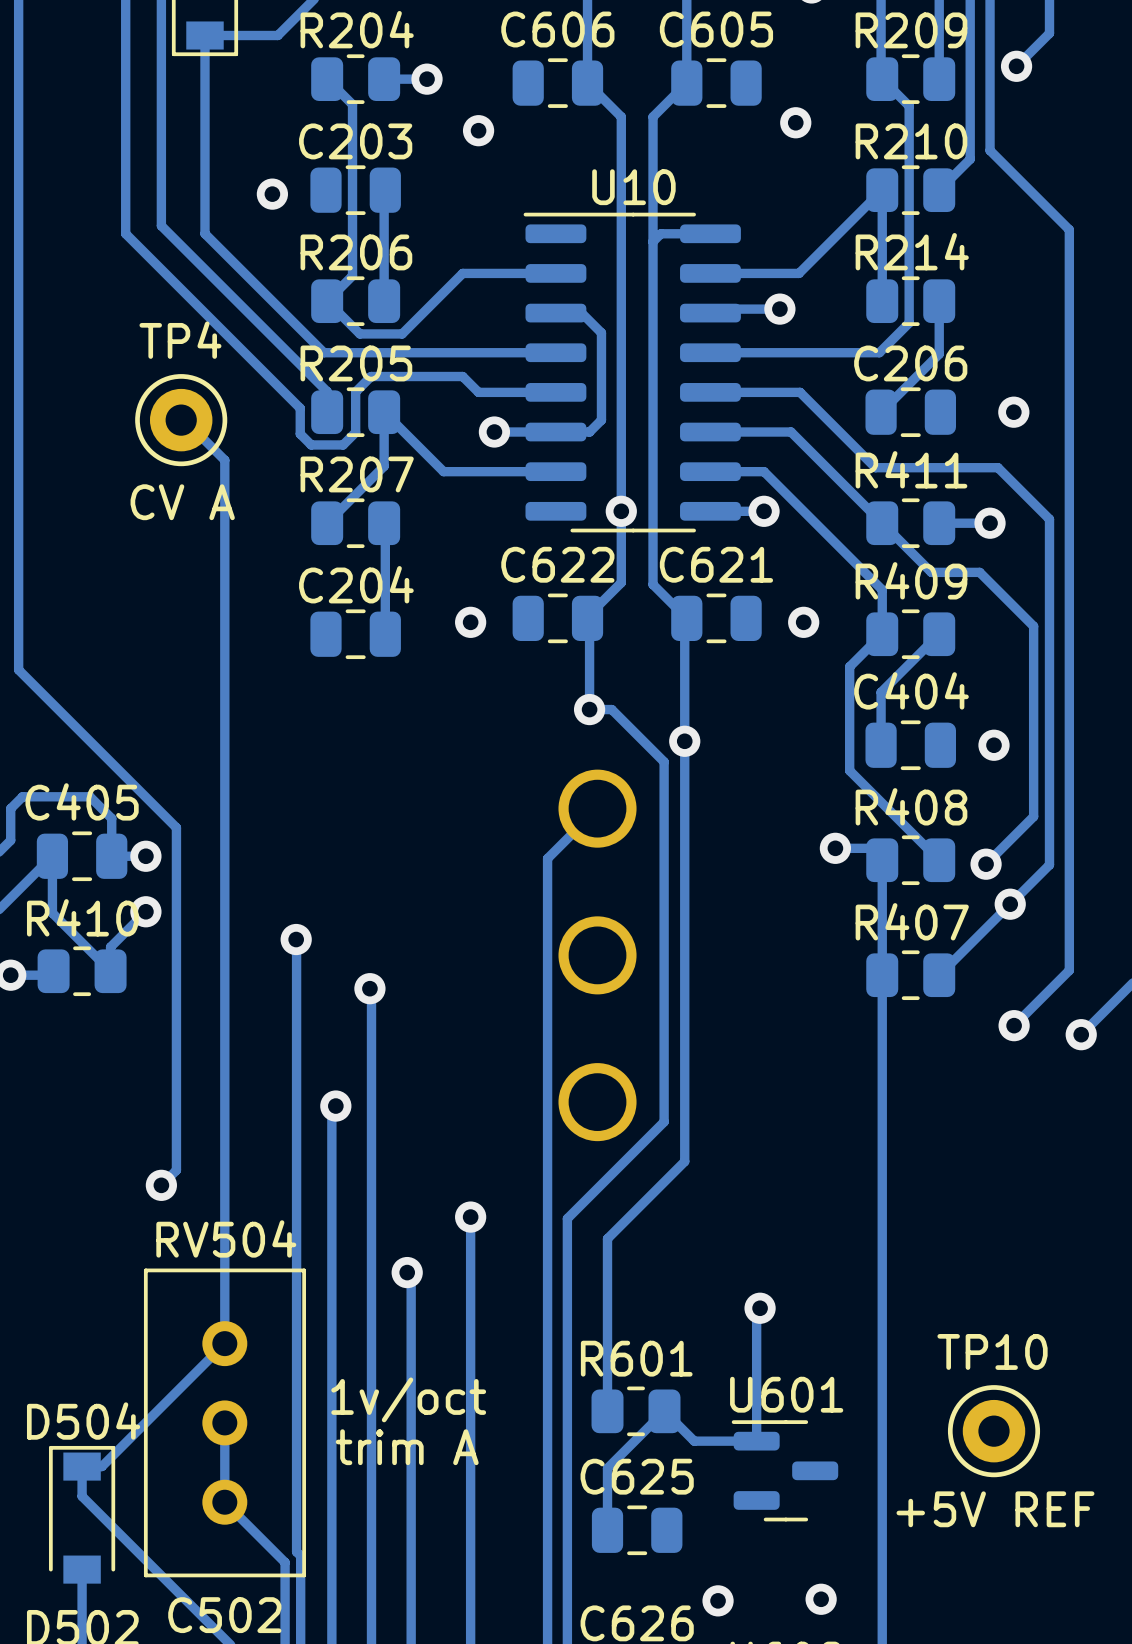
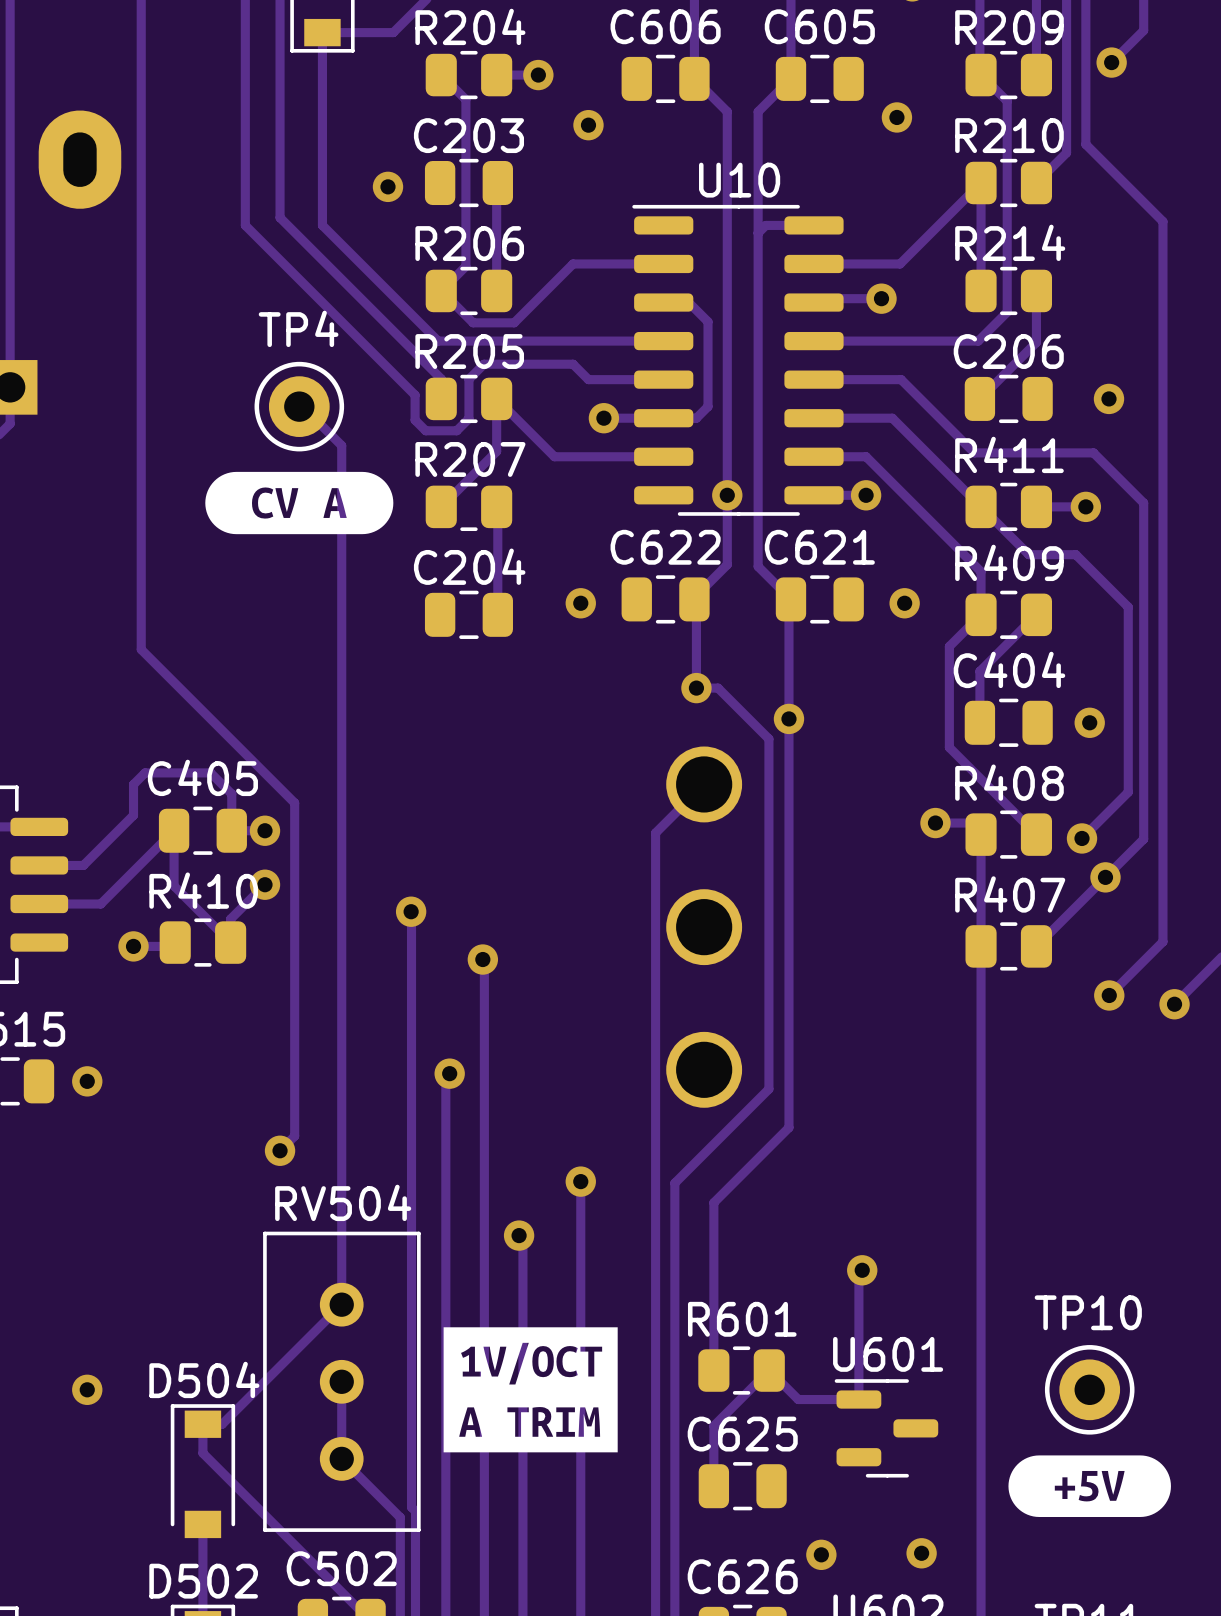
drawing: none -> [205, 471, 394, 535]
text: CV A (182, 502) -> none
drawing: none -> [443, 1327, 618, 1453]
text: 1v/oct (408, 1399) -> none
text: trim A (407, 1447) -> none
drawing: none -> [1008, 1455, 1171, 1517]
text: +5V REF (995, 1509) -> none

